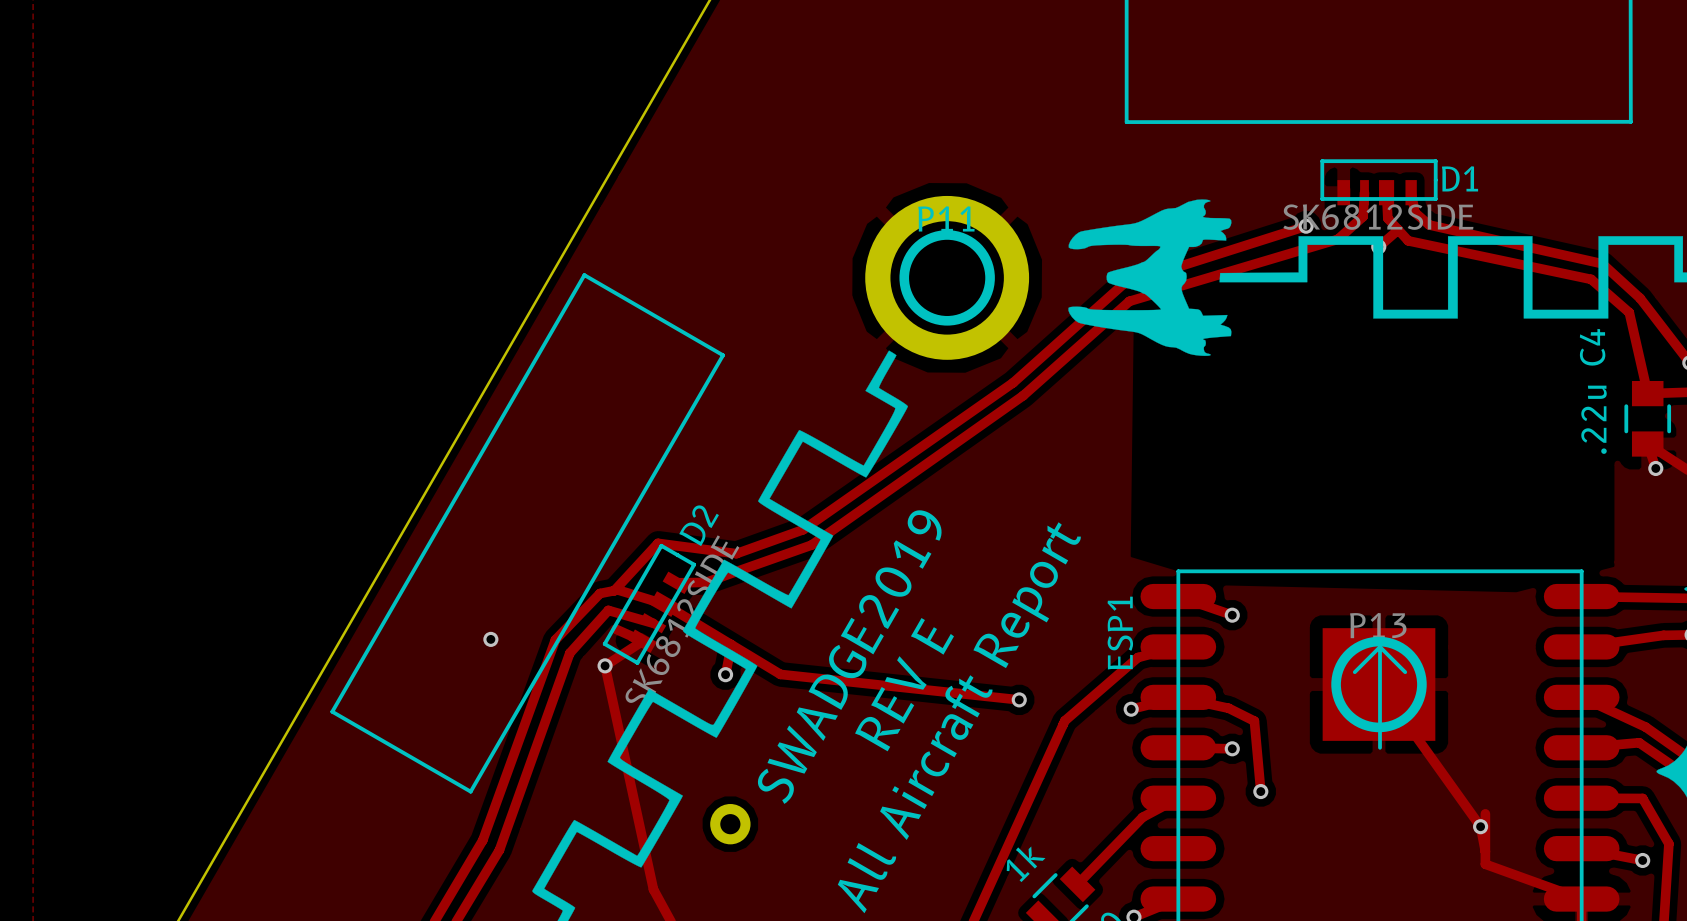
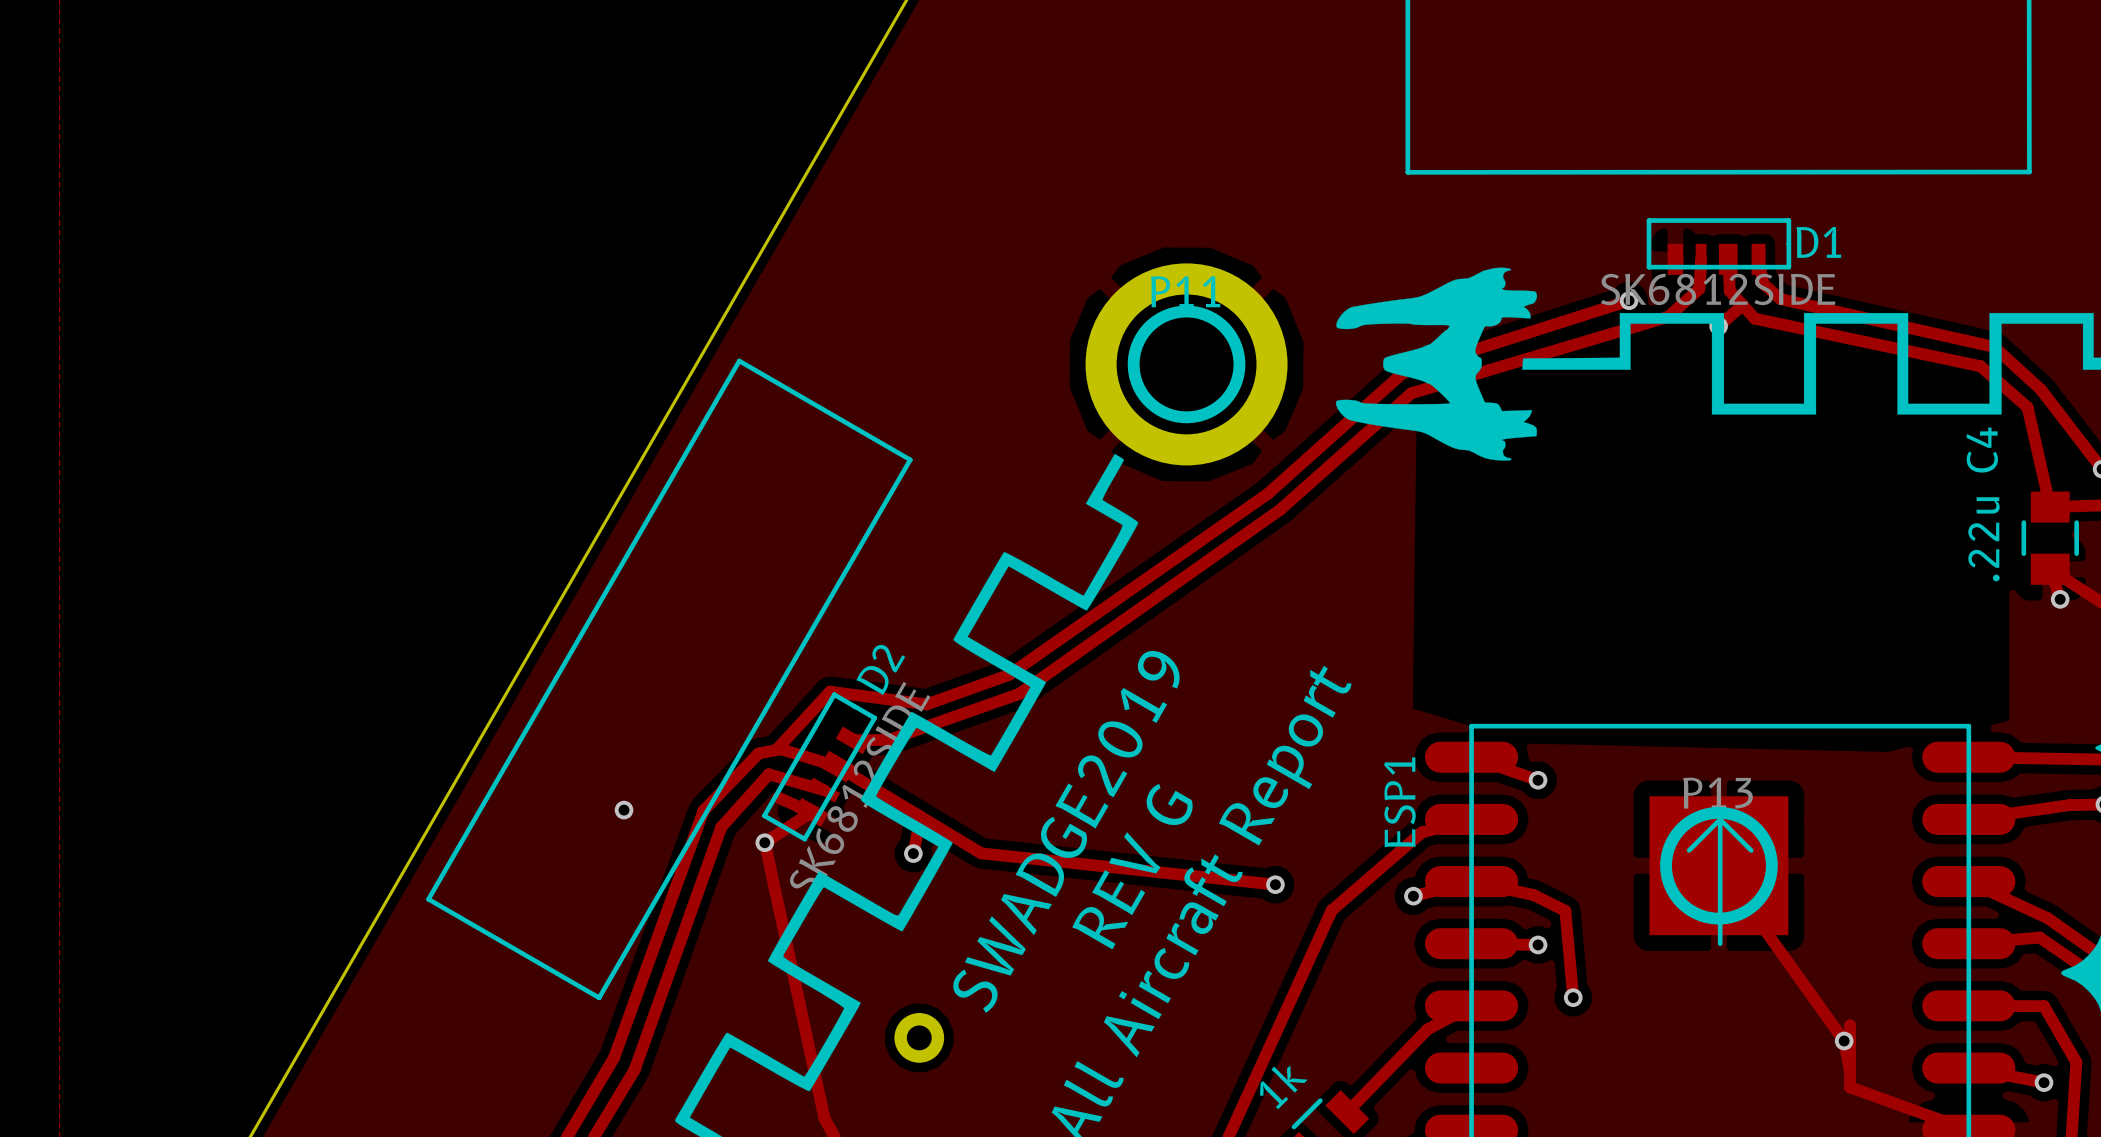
text: REV E (904, 684) -> REV G (1132, 866)

